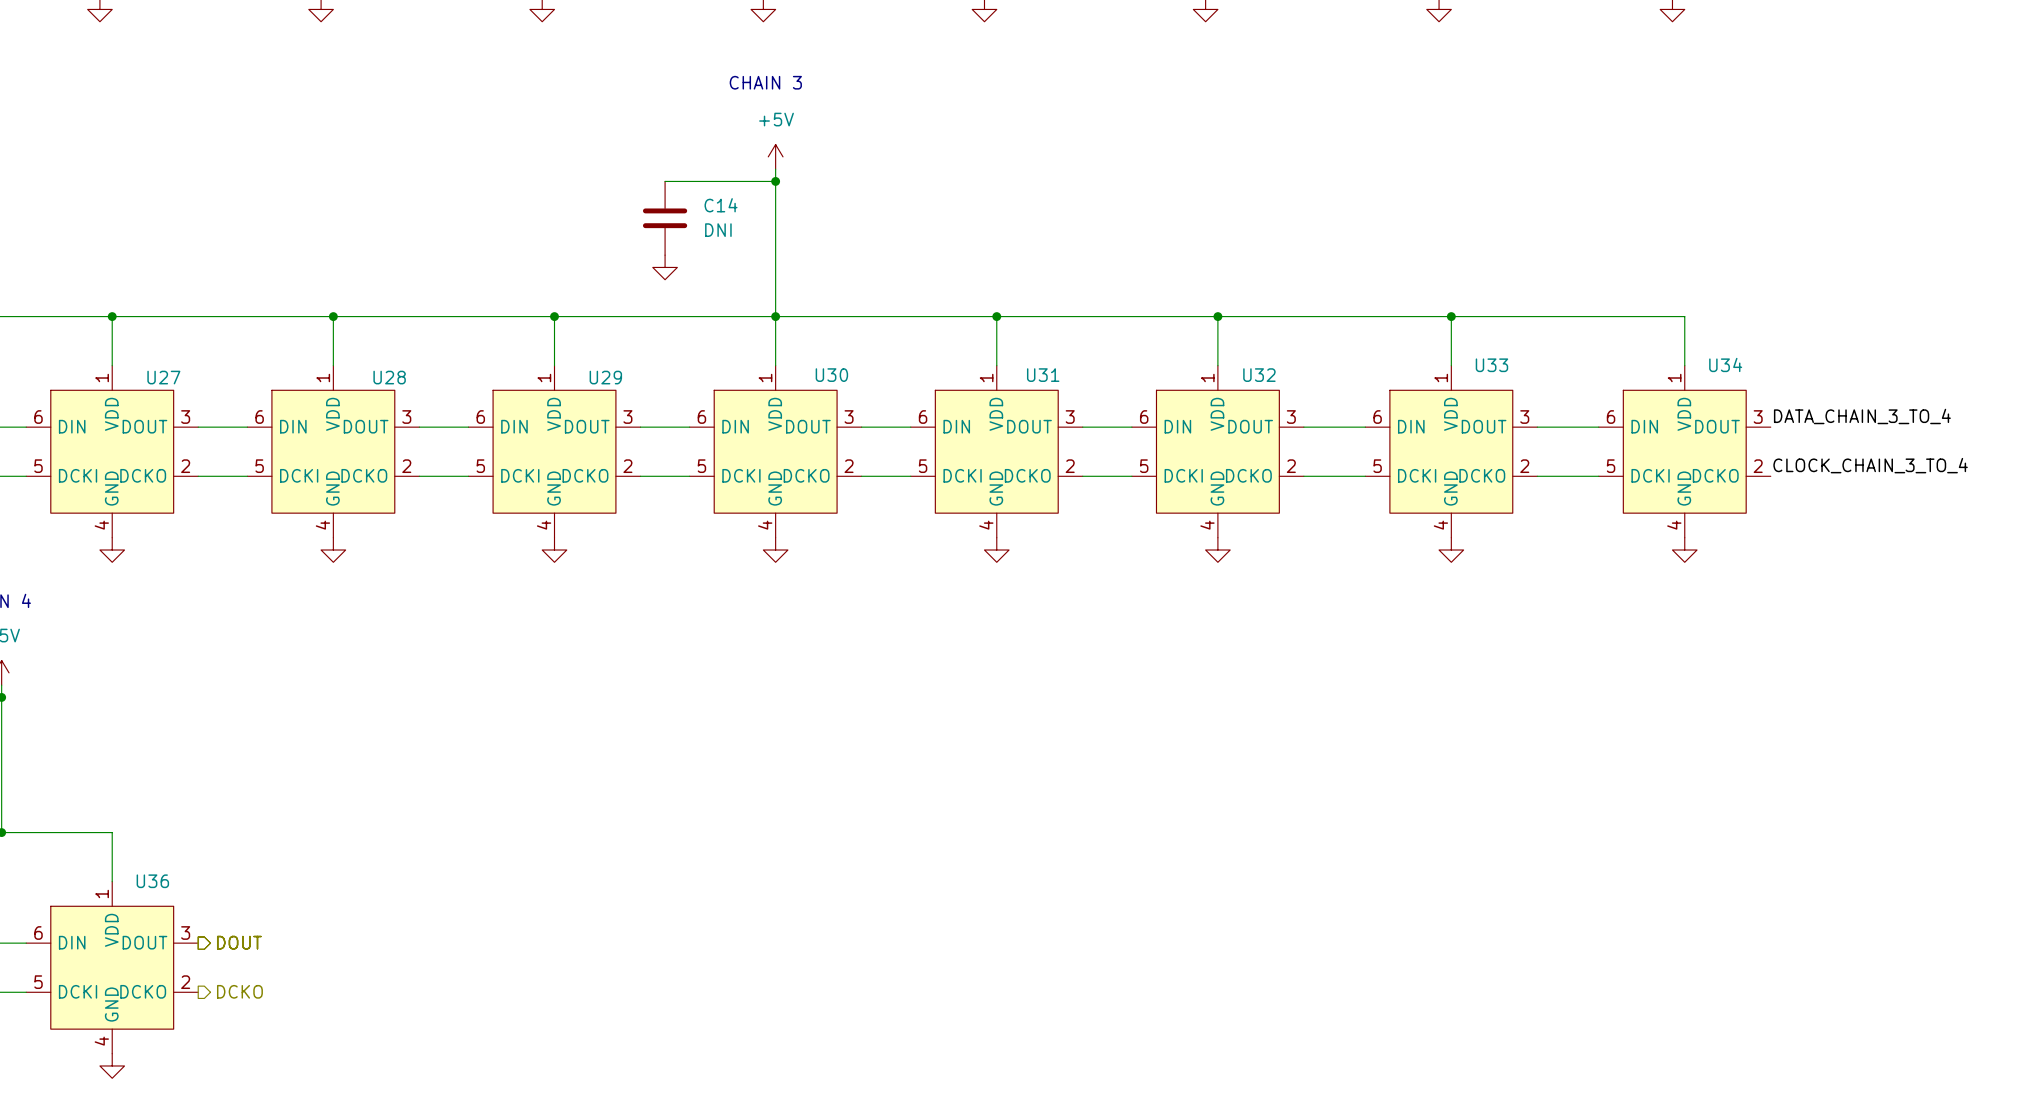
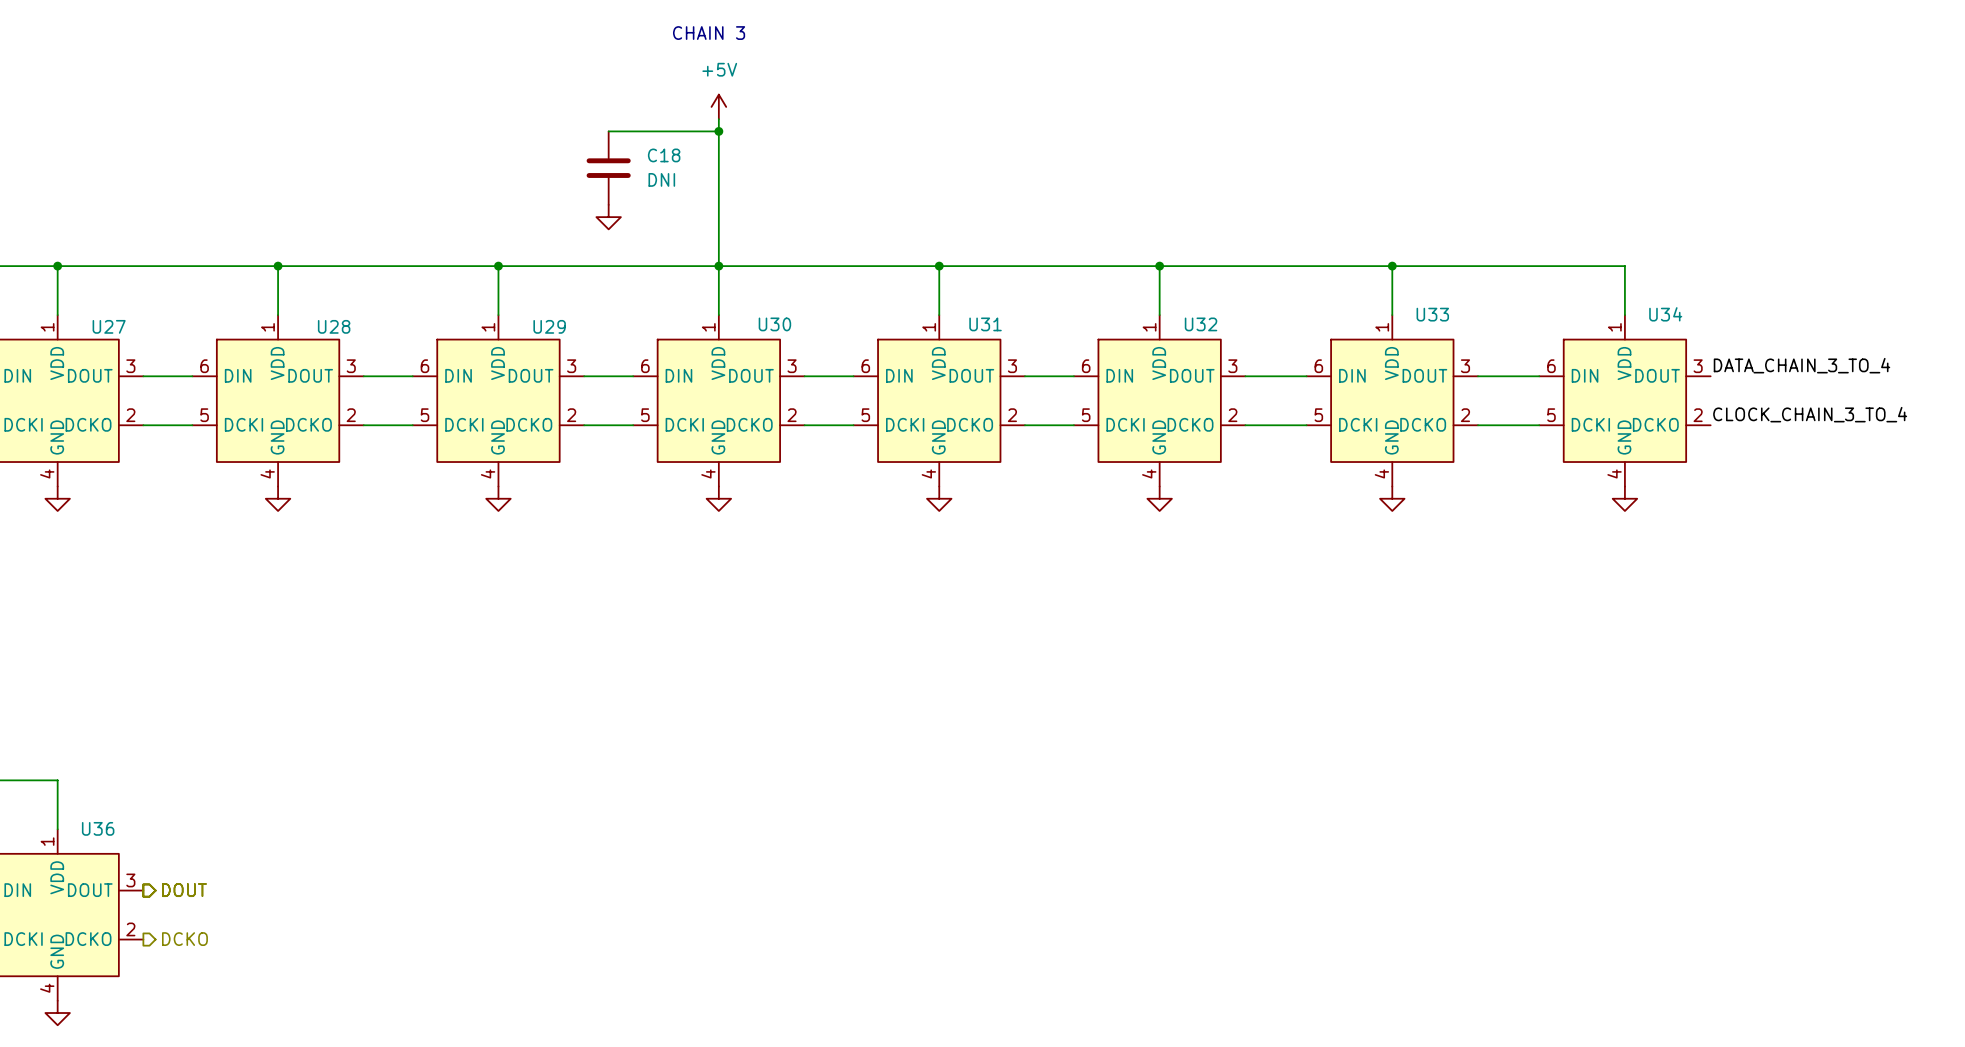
C14 name: C14 (721, 205) -> C18 (664, 155)

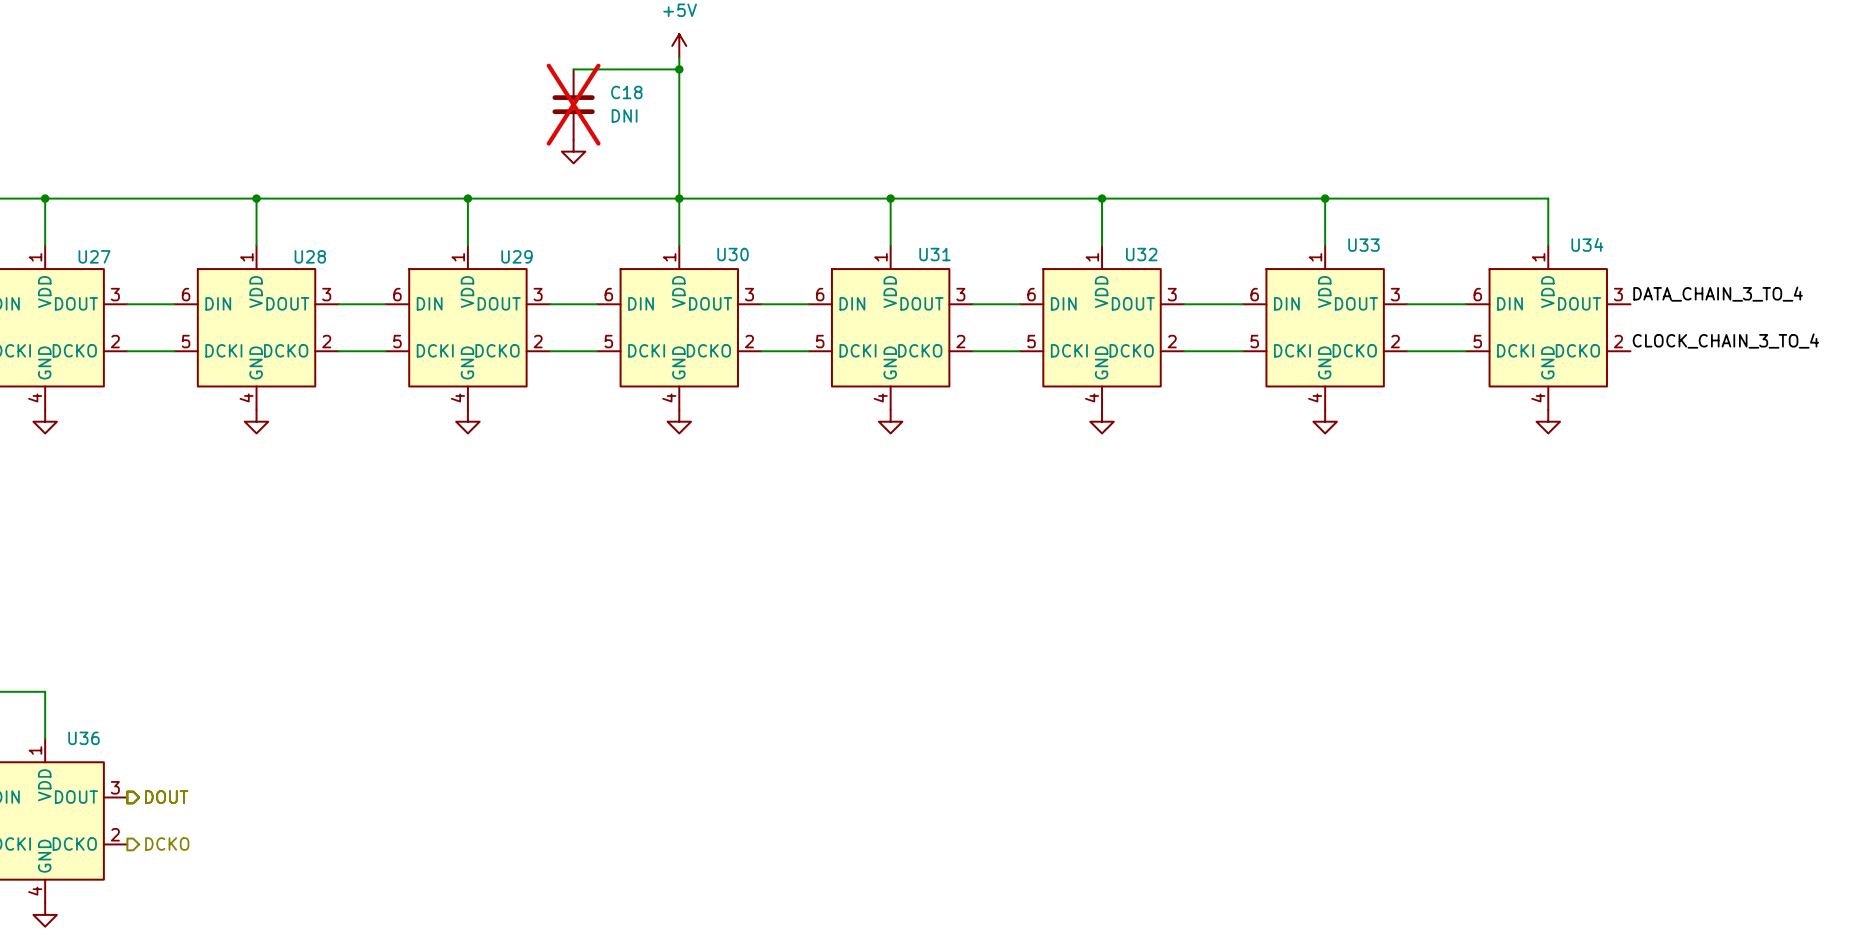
C18 do-not-place cross: none -> (573, 104)

